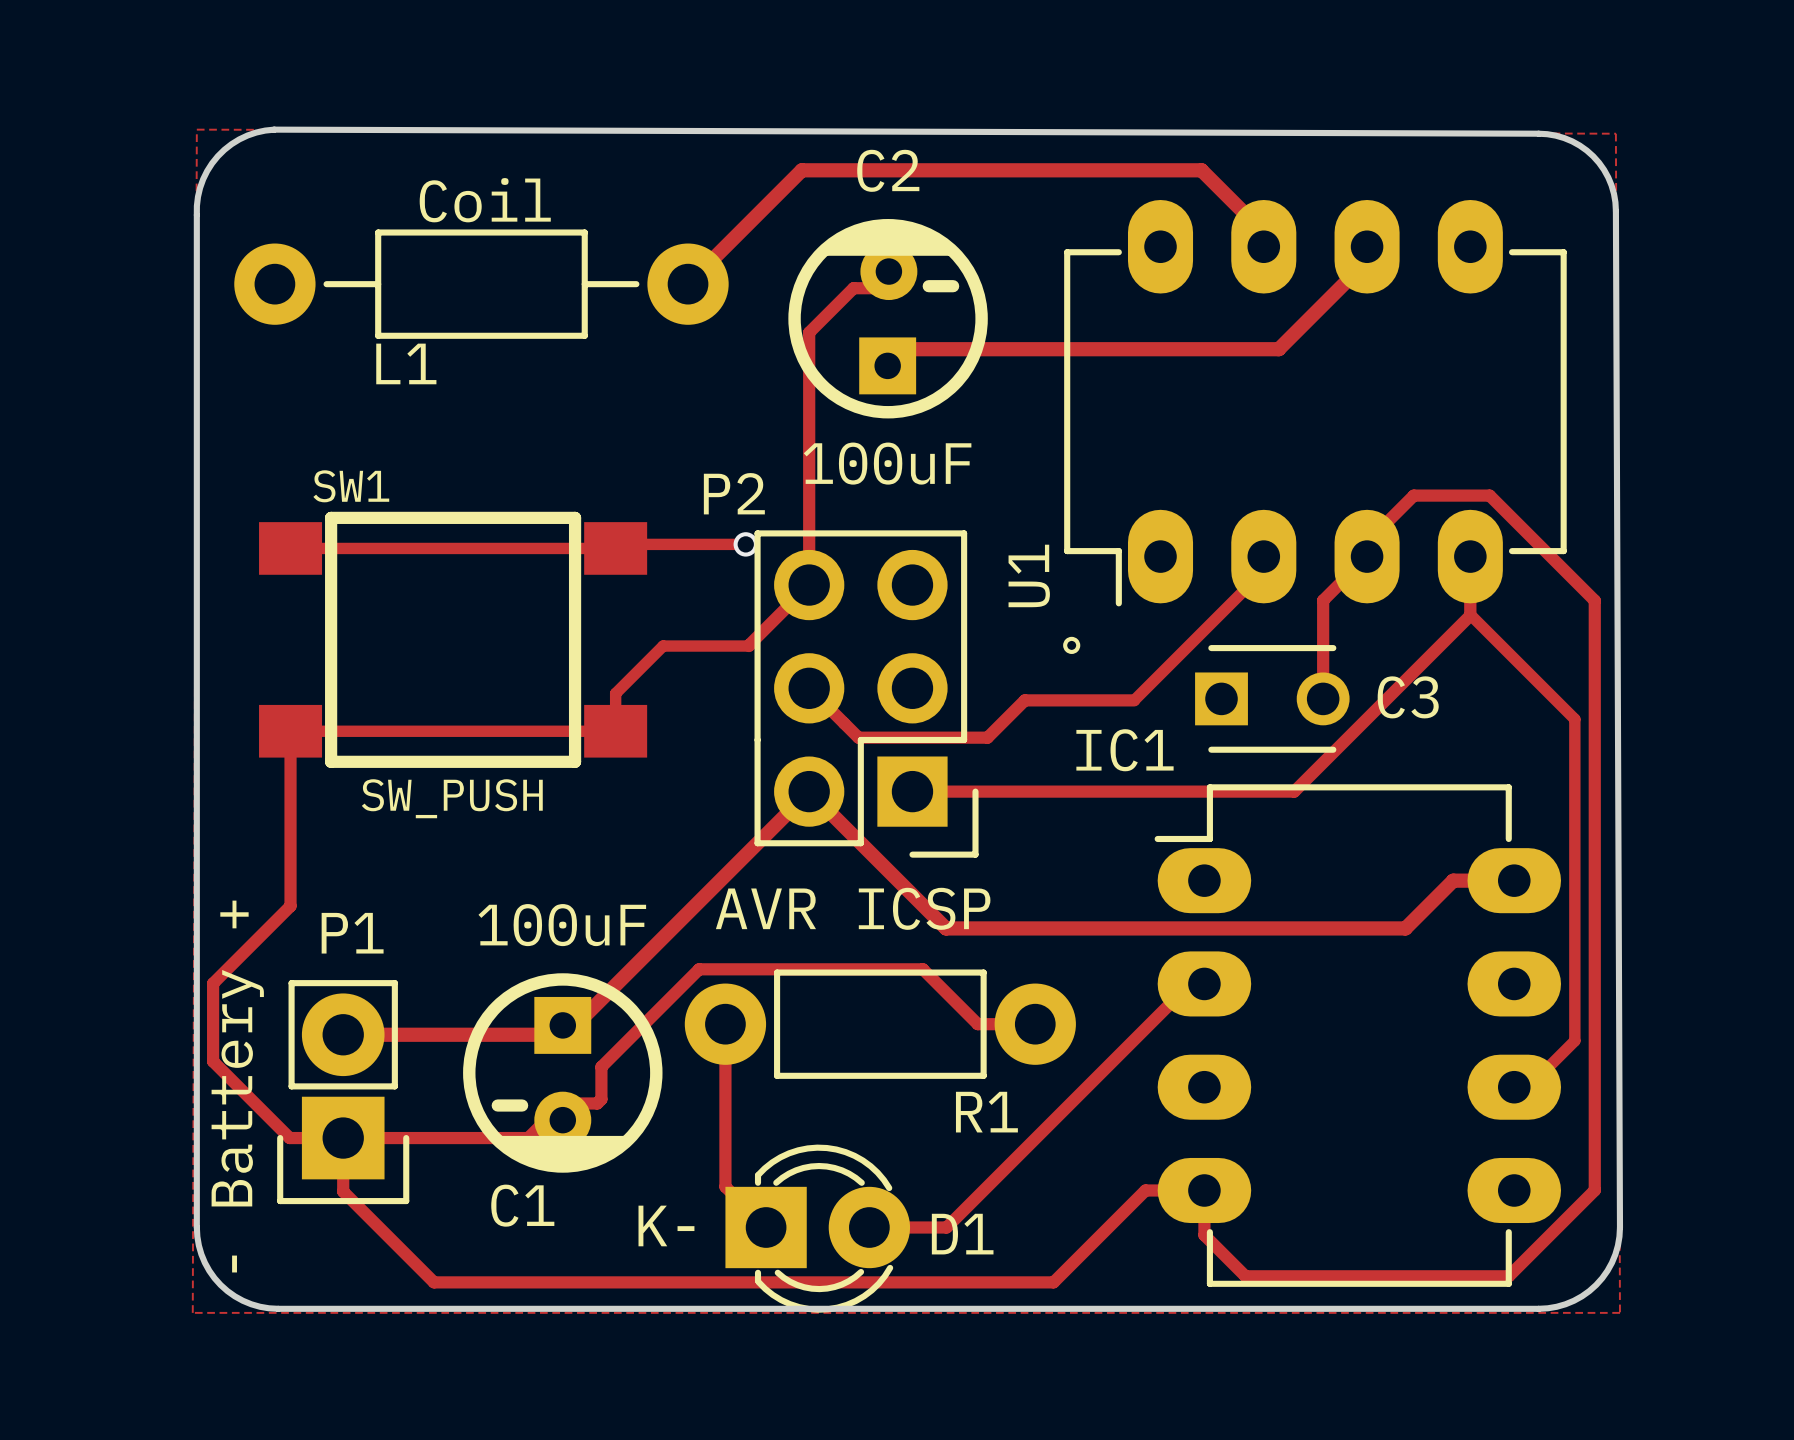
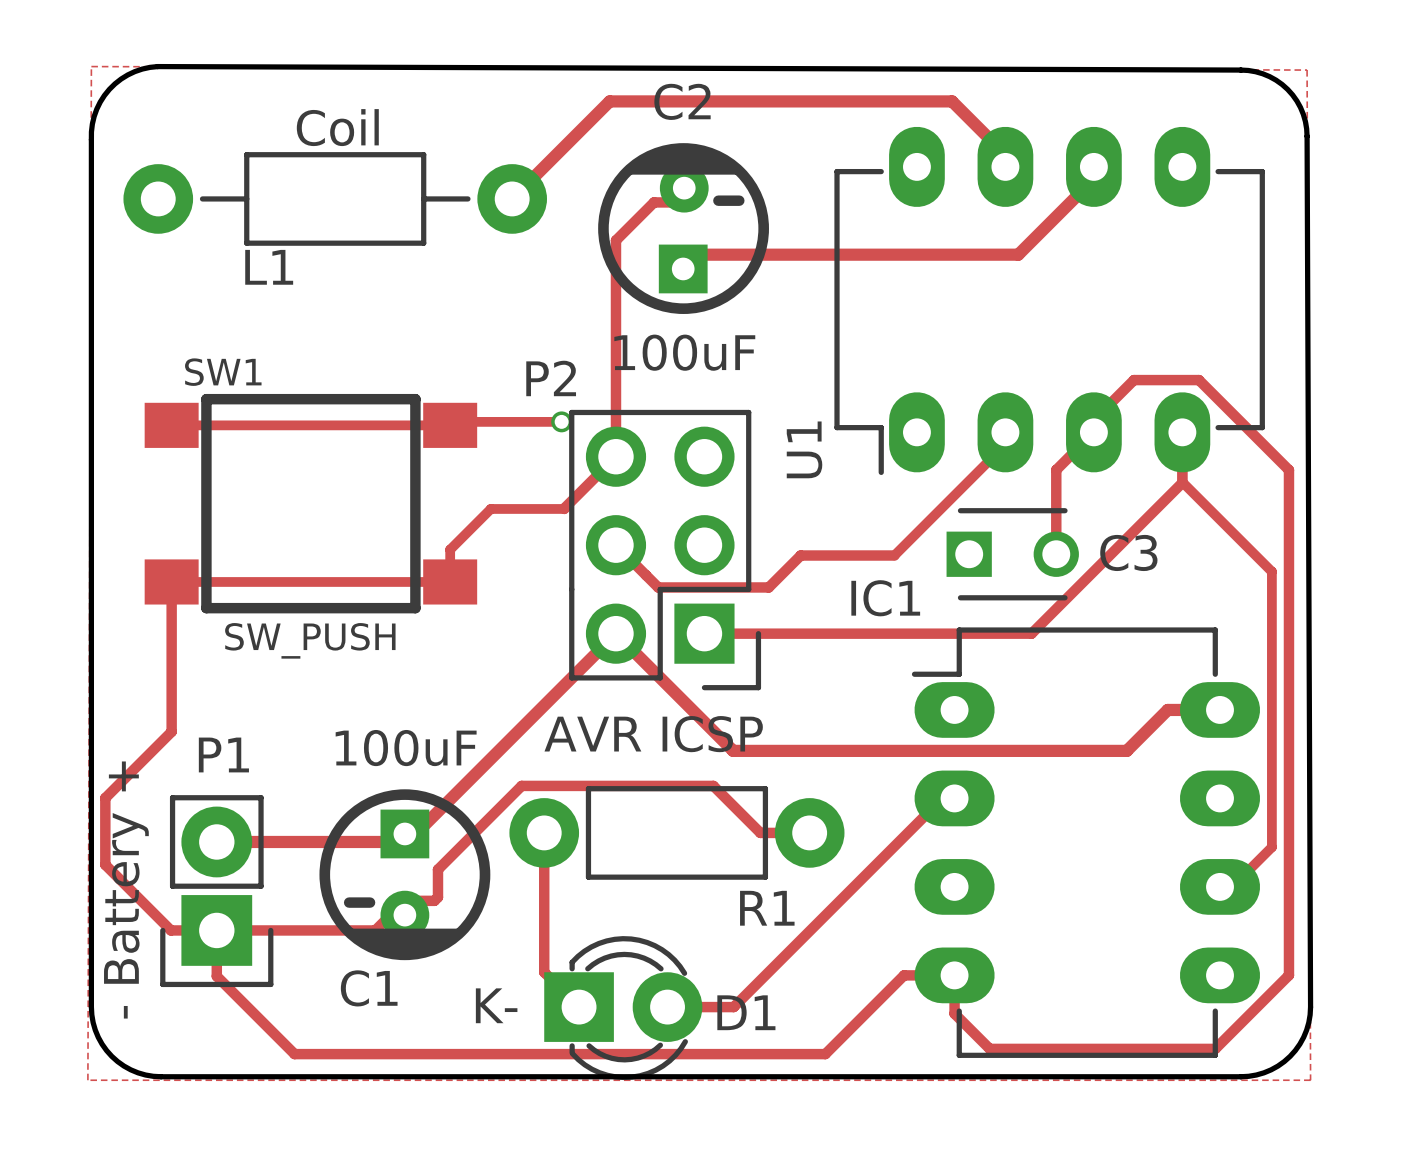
U1 footprint: [1063, 199, 1567, 654] -> [834, 126, 1265, 476]

